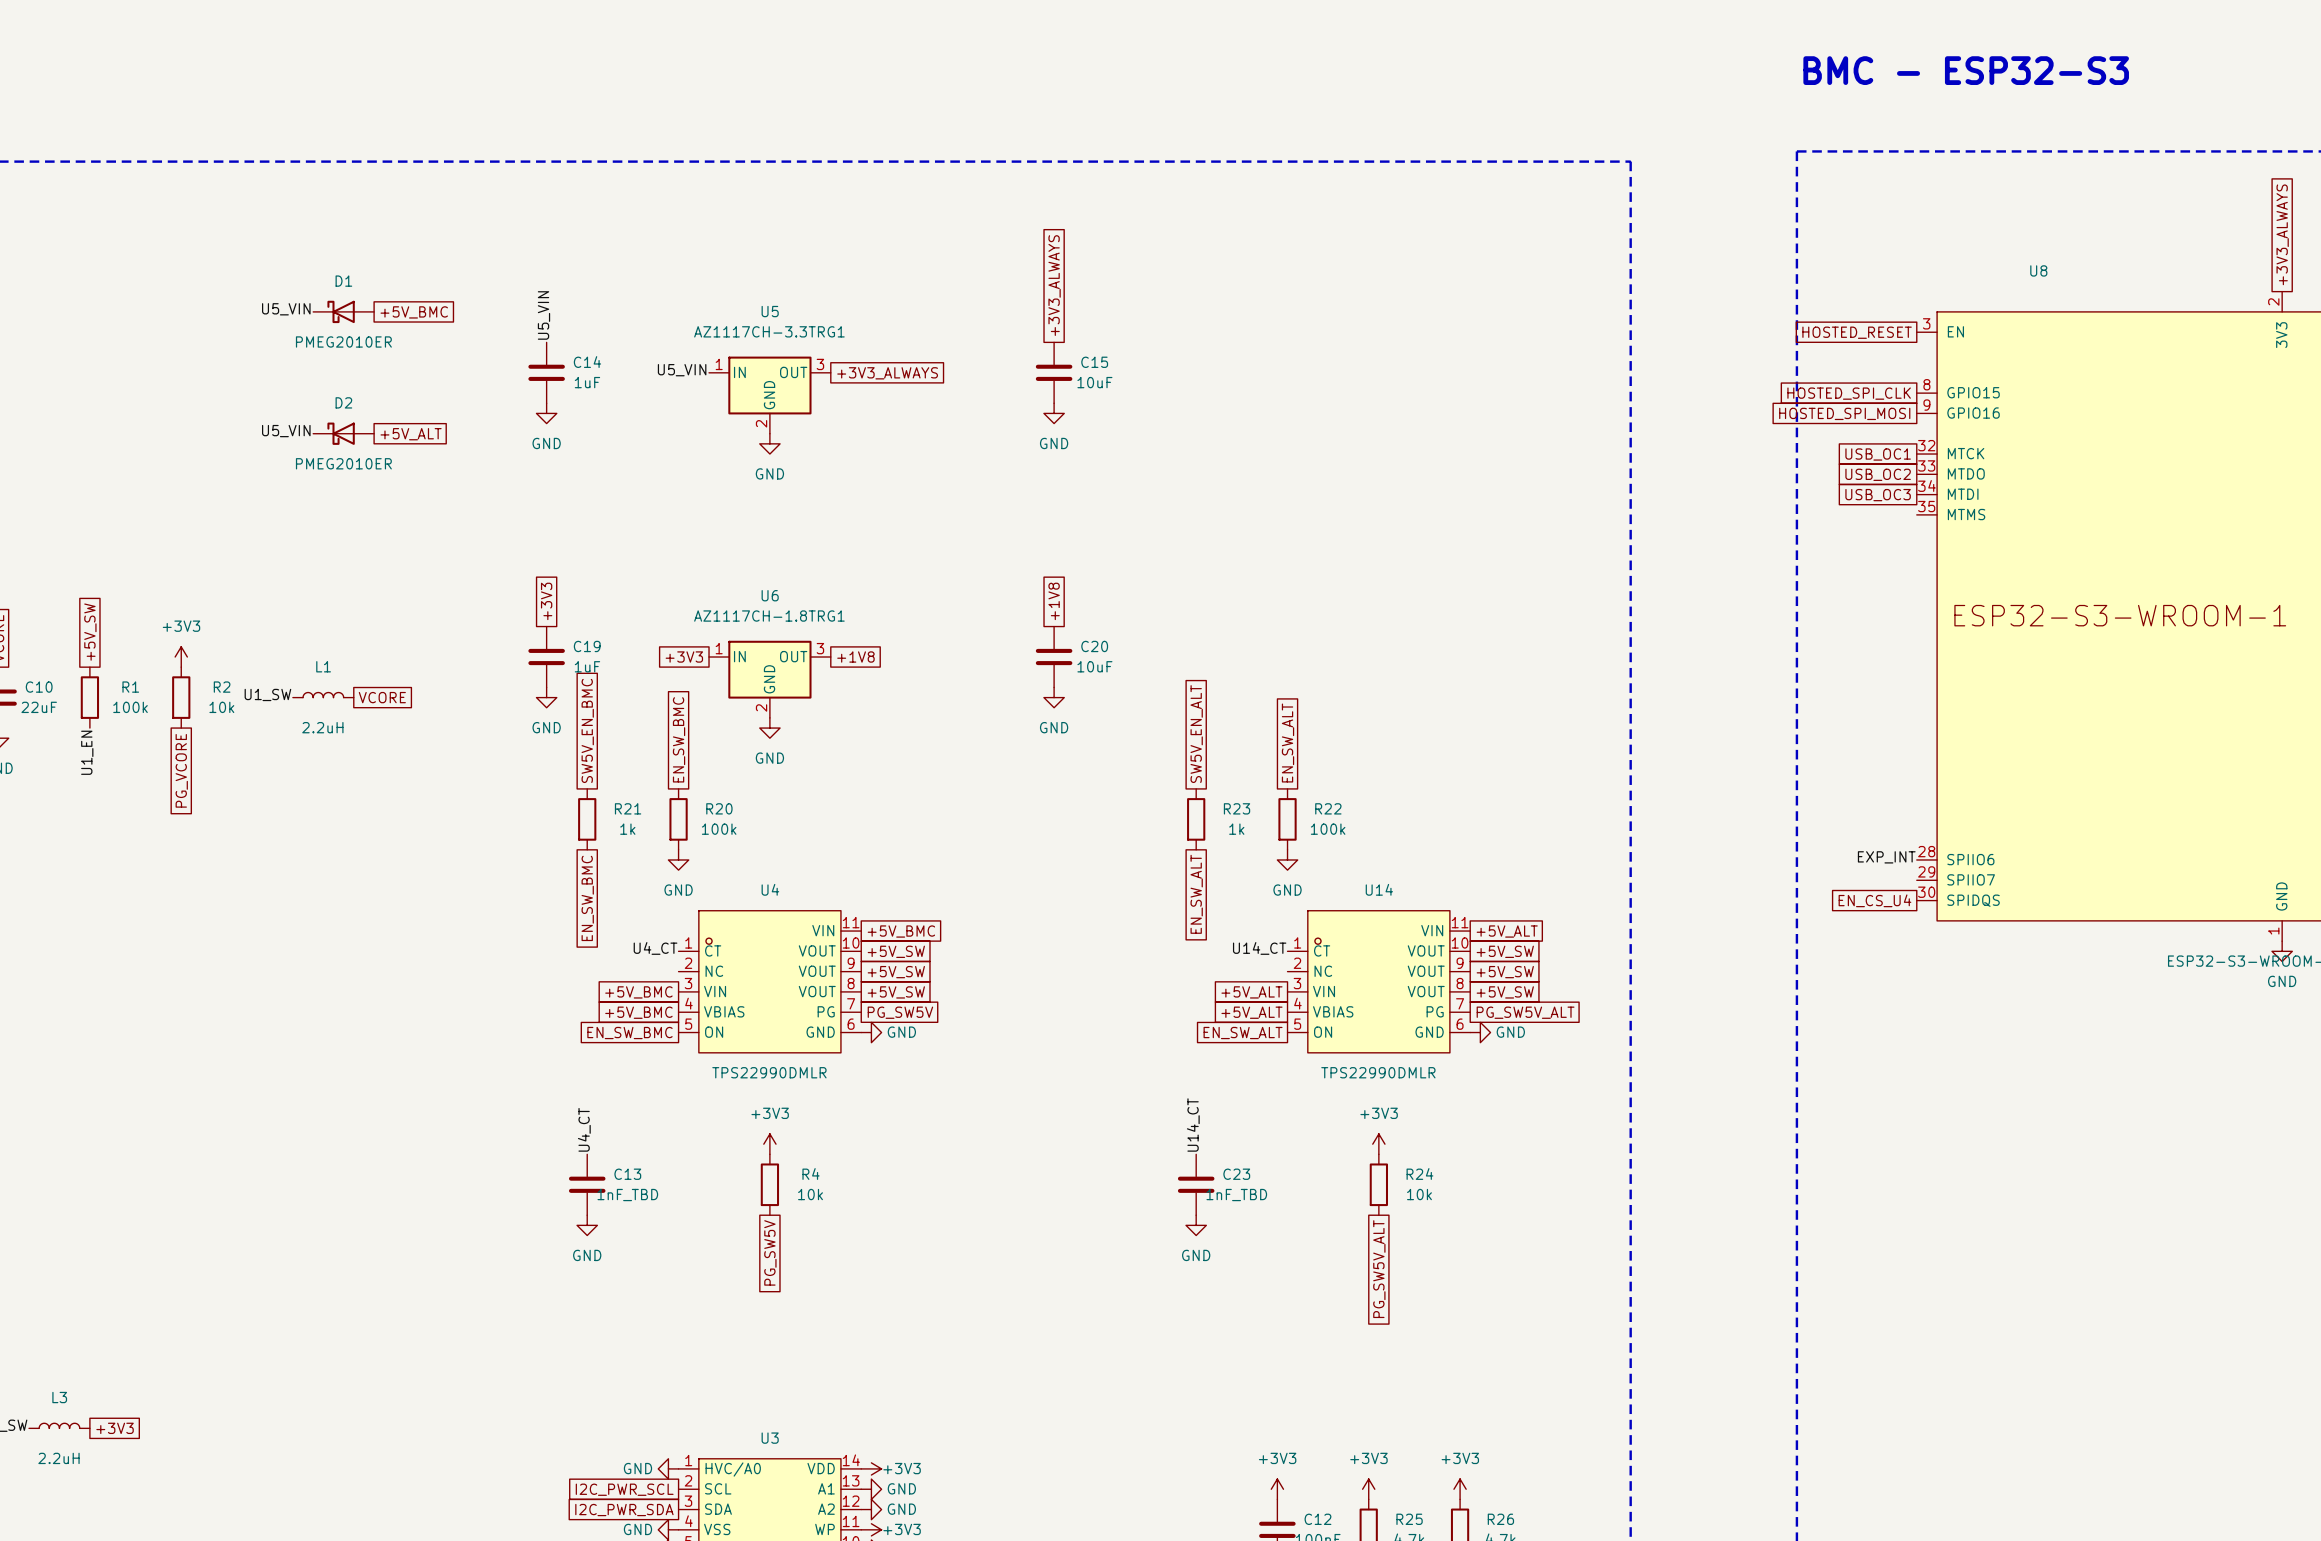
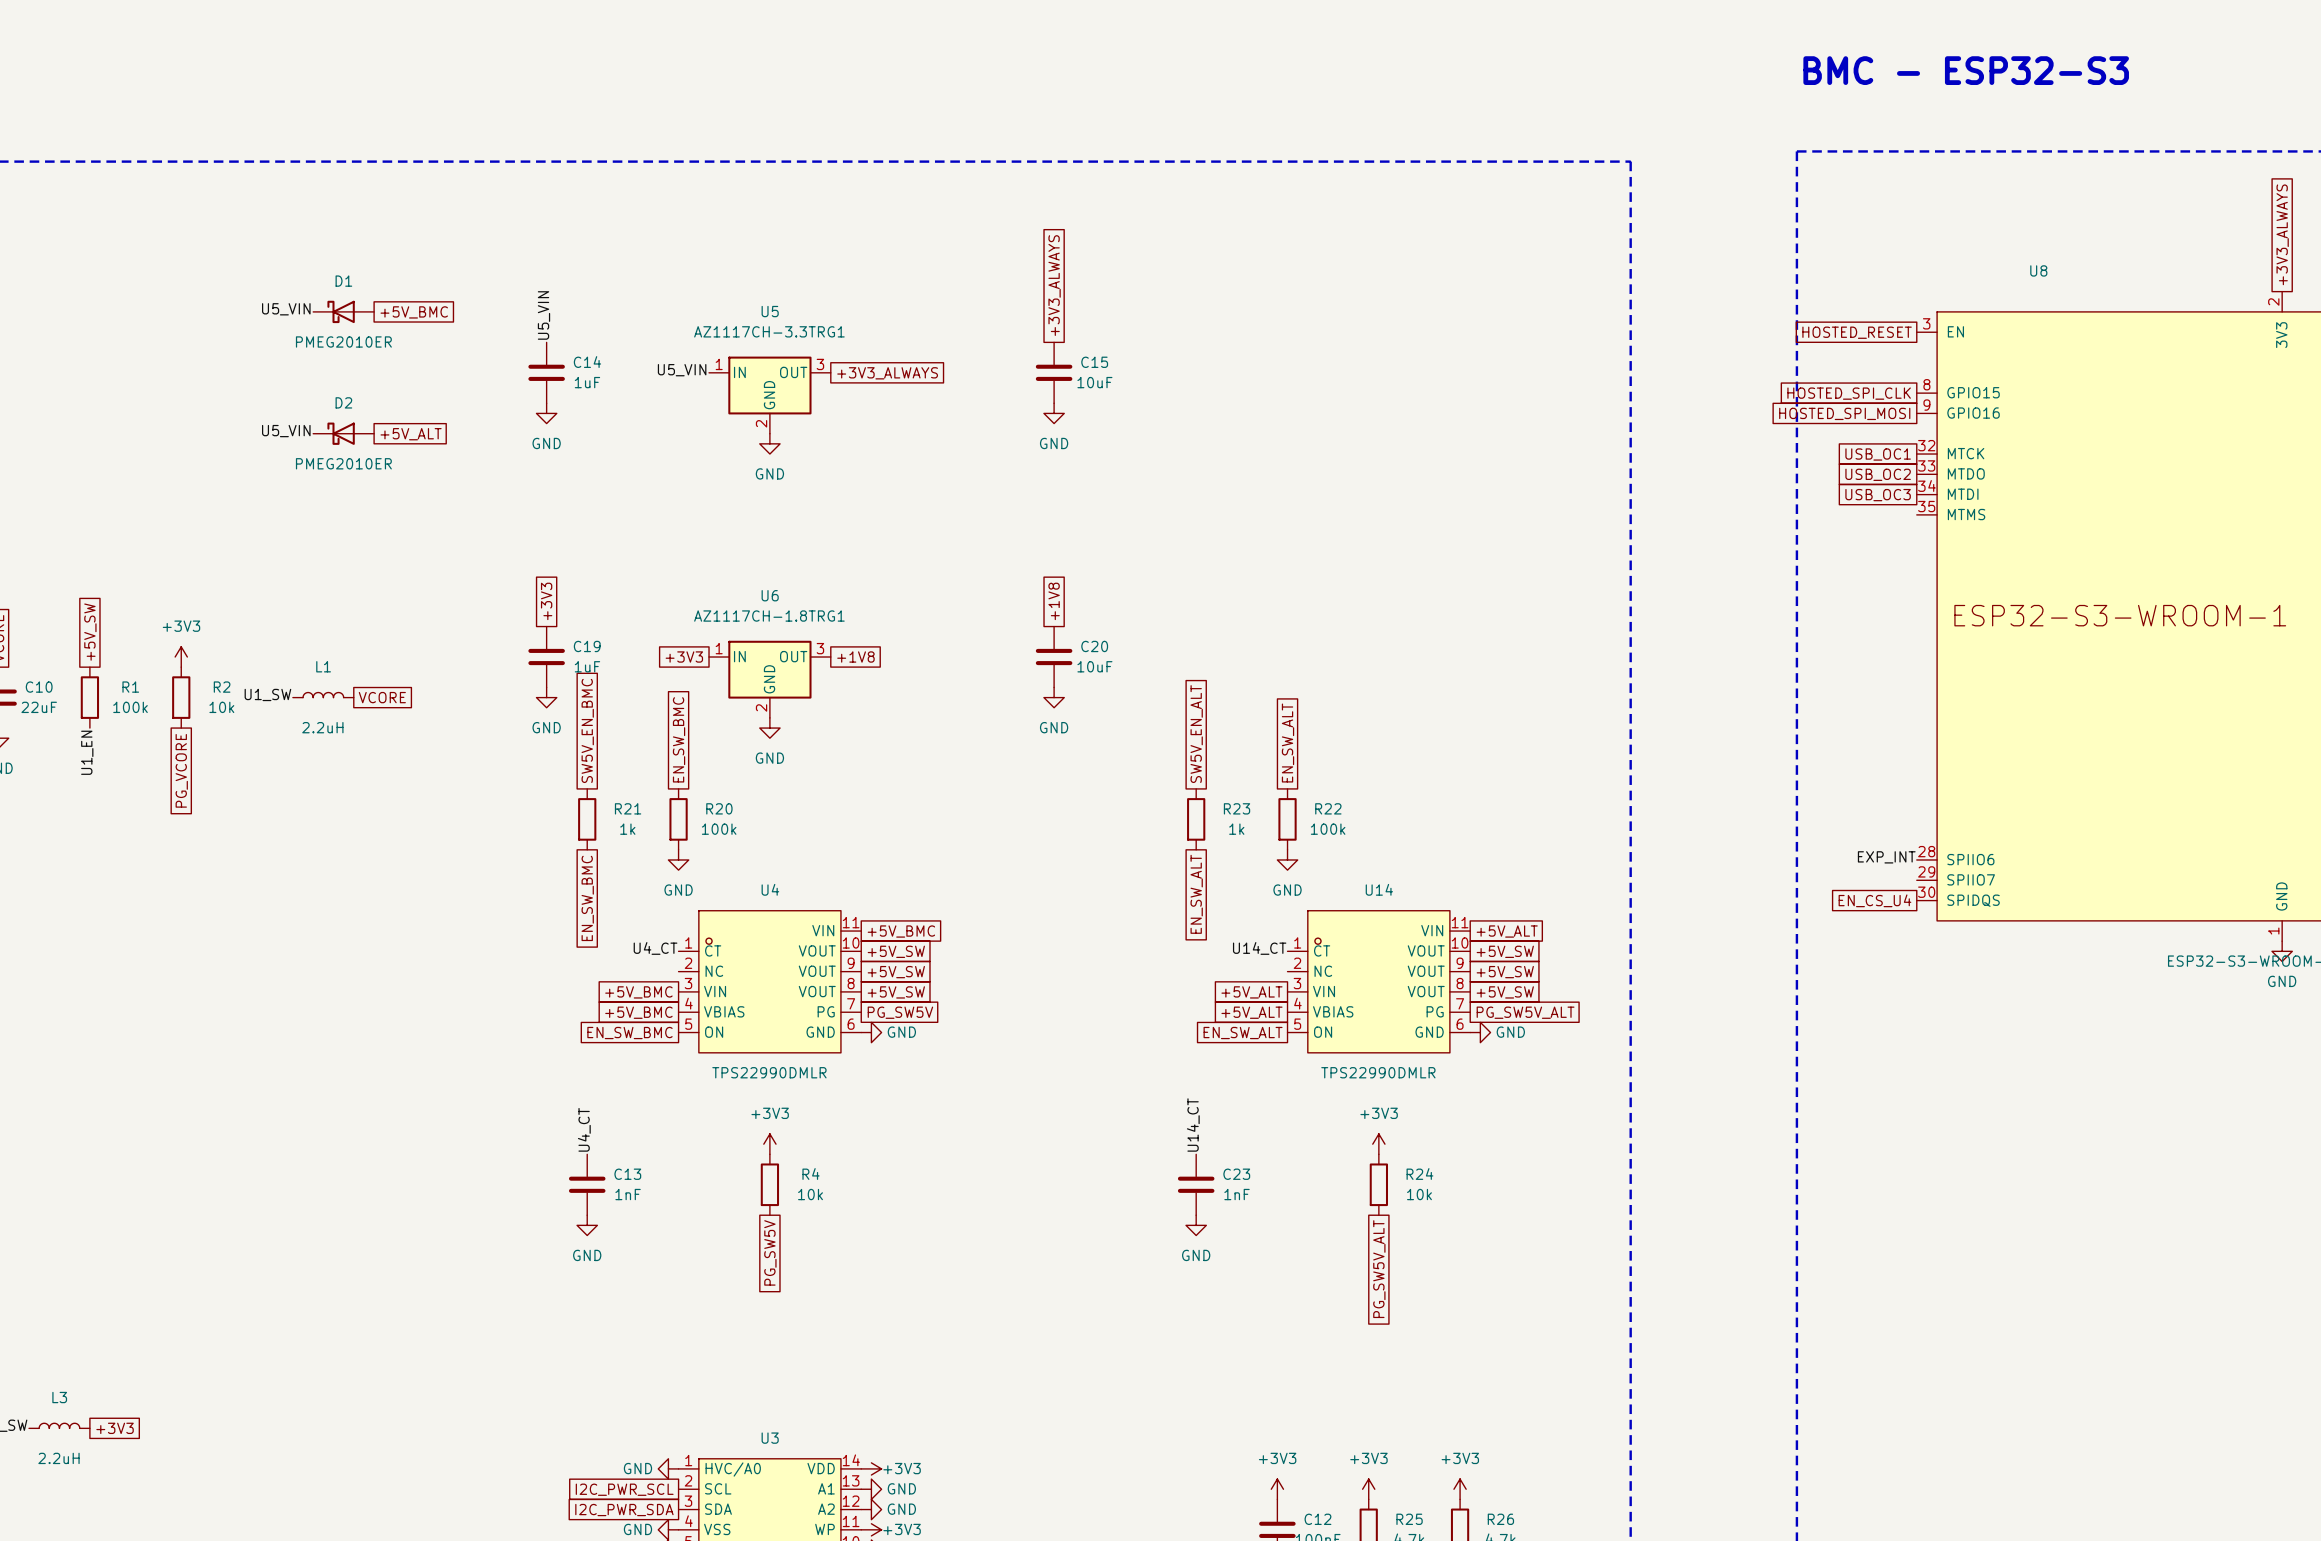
C13 value: 1nF_TBD (627, 1195) -> 1nF (628, 1194)
C23 value: 1nF_TBD (1236, 1195) -> 1nF (1237, 1194)

